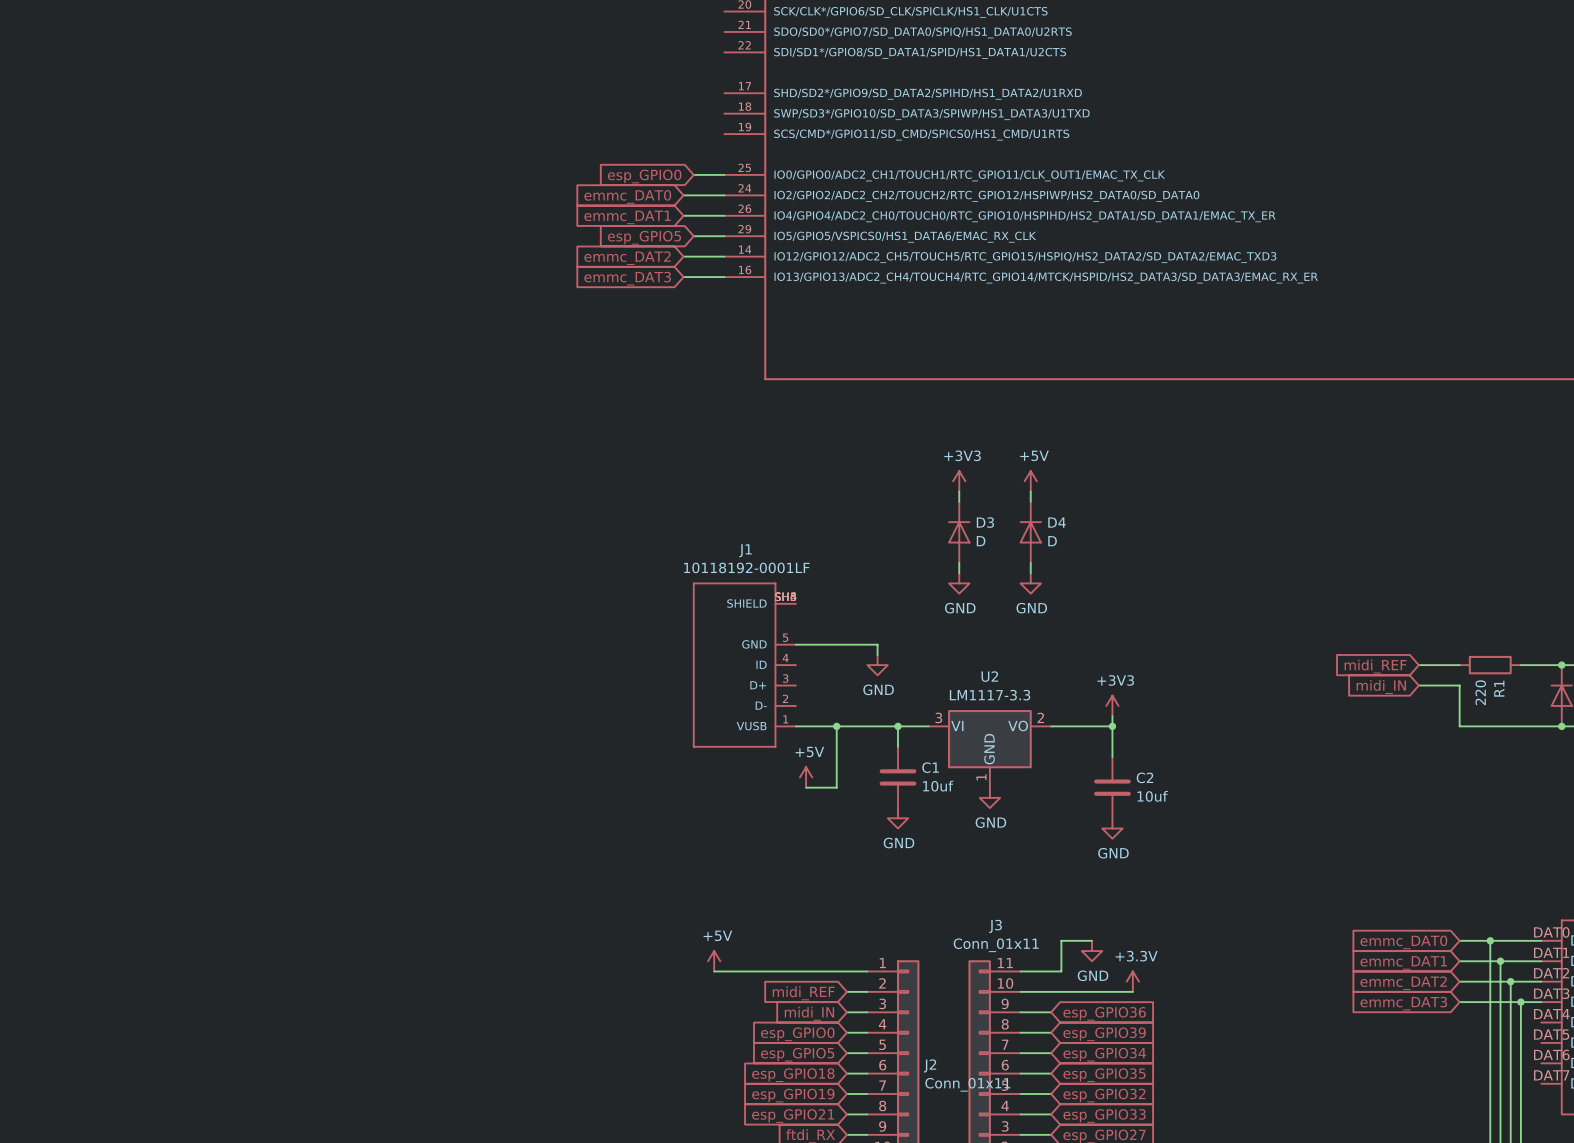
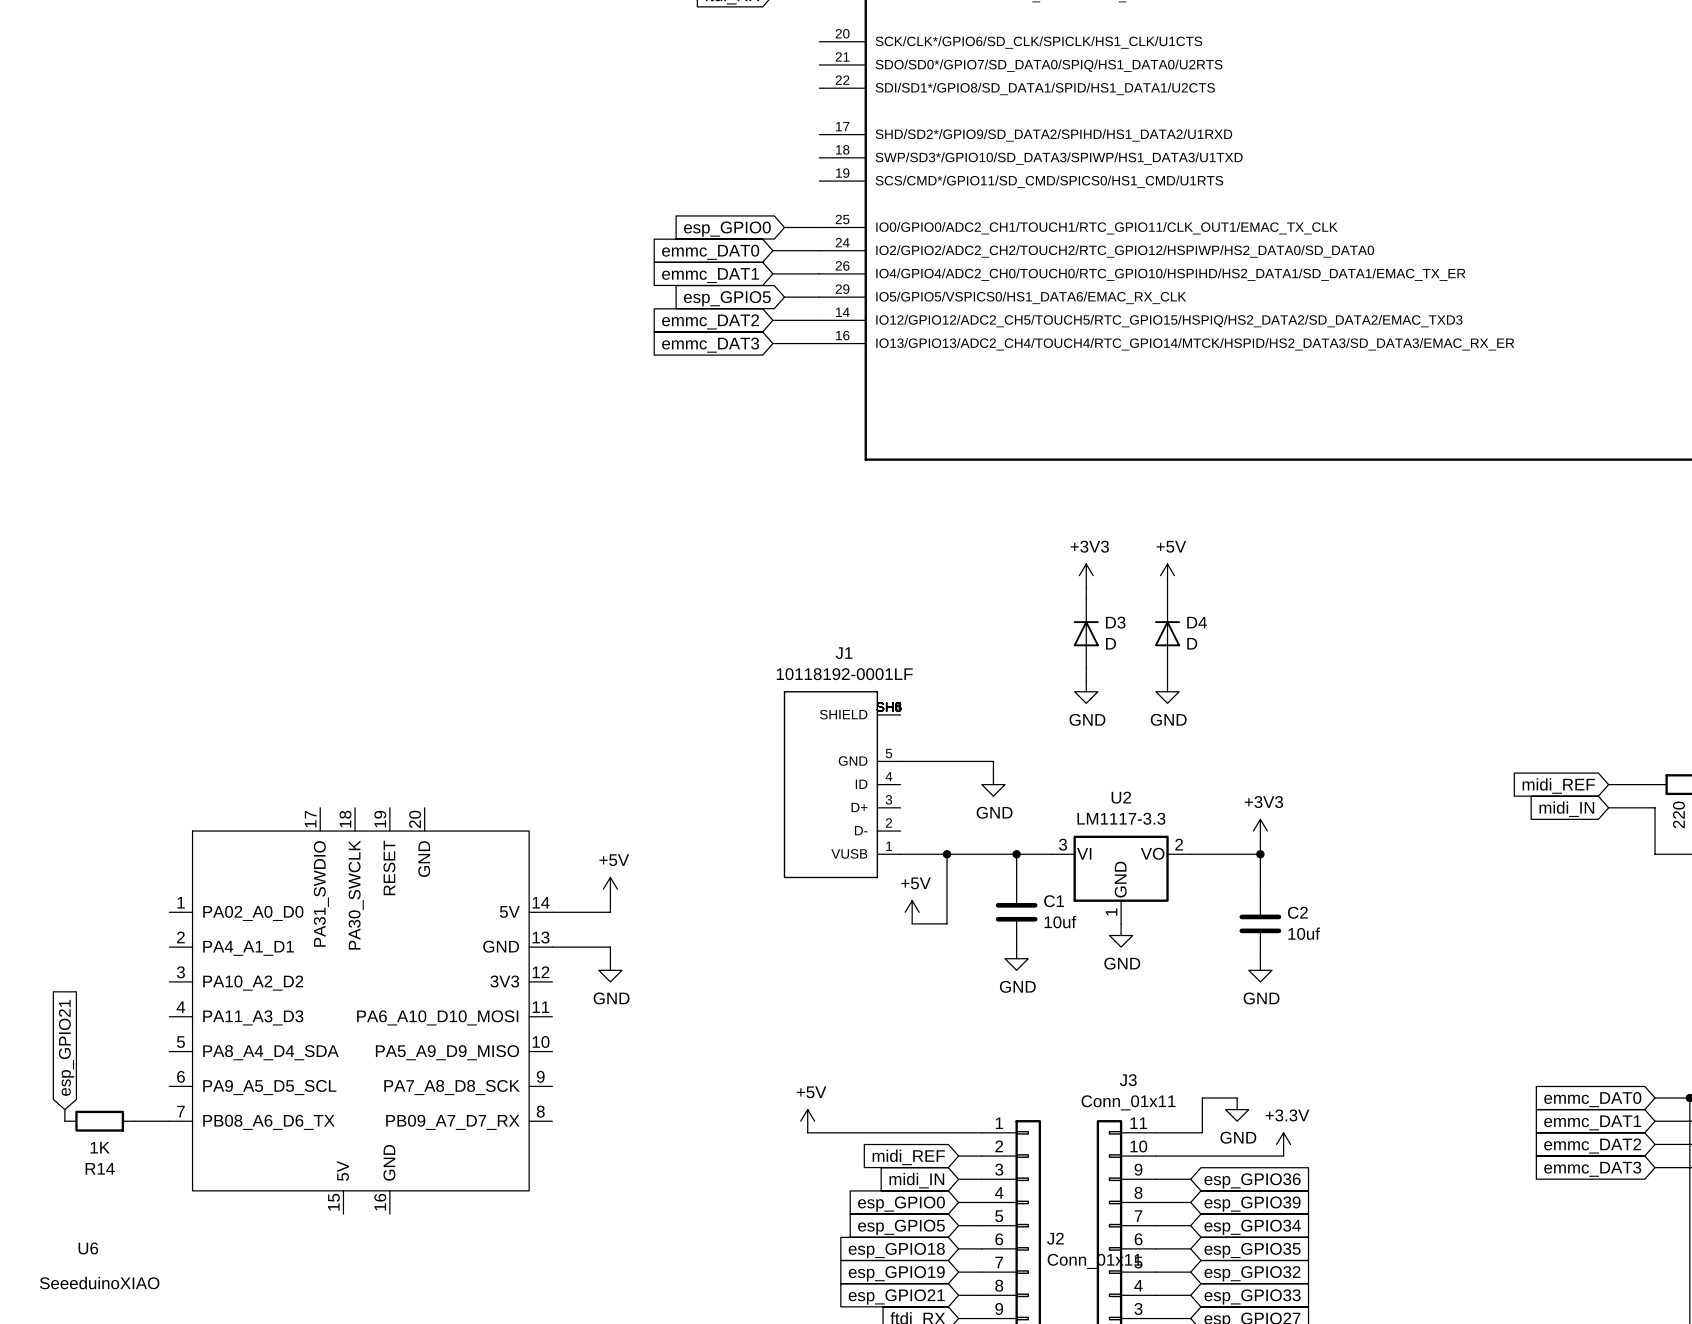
power symbol: none -> +5V (610, 889)
wire: none -> (610, 900) (610, 912) (552, 912)
wire: none -> (552, 947) (610, 947) (610, 958)
power symbol: none -> GND (610, 970)
U6: none -> SeeeduinoXIAO (360, 1010)
global label: none -> esp_GPIO21 (66, 1047)
wire: none -> (64, 1109) (64, 1121)
R14: none -> 1K (99, 1121)
wire: none -> (134, 1121) (169, 1121)

